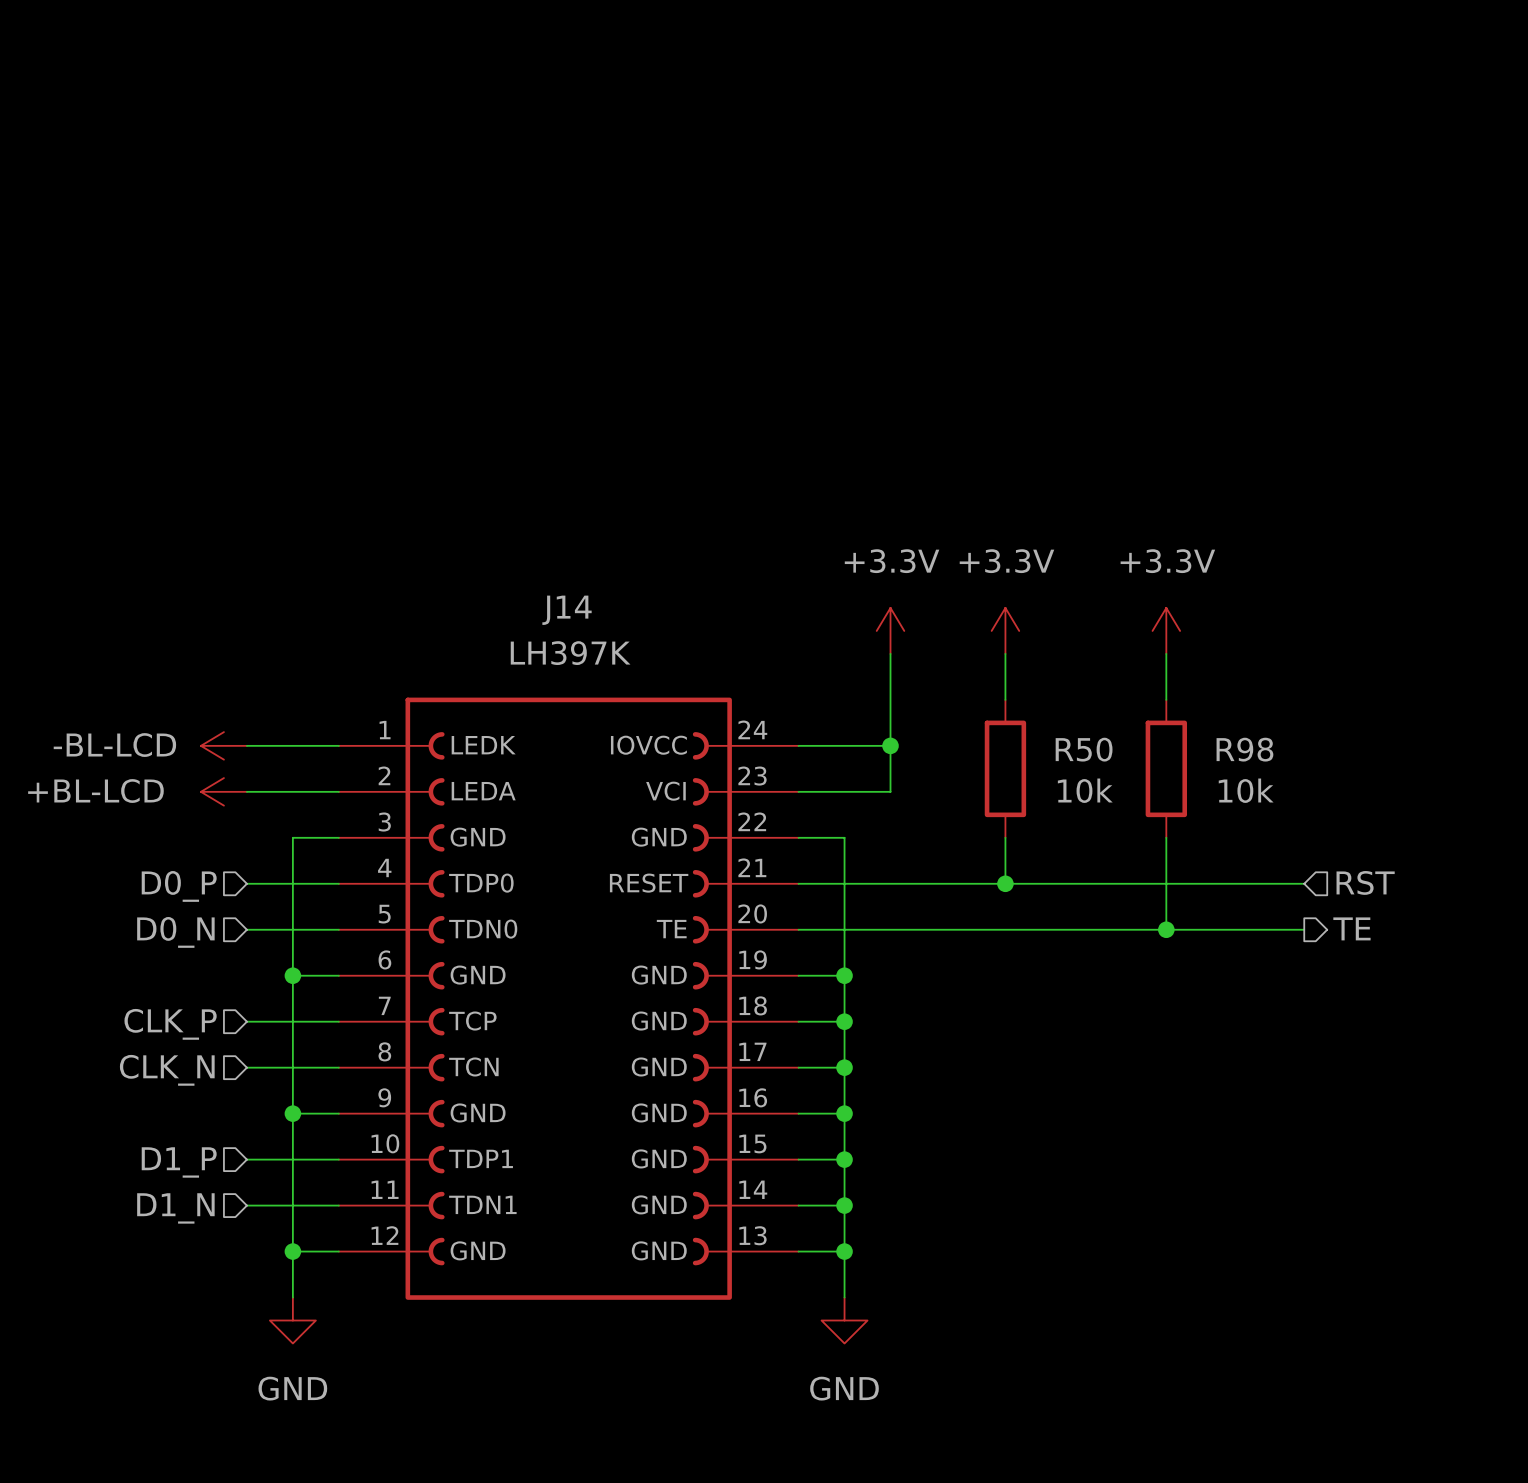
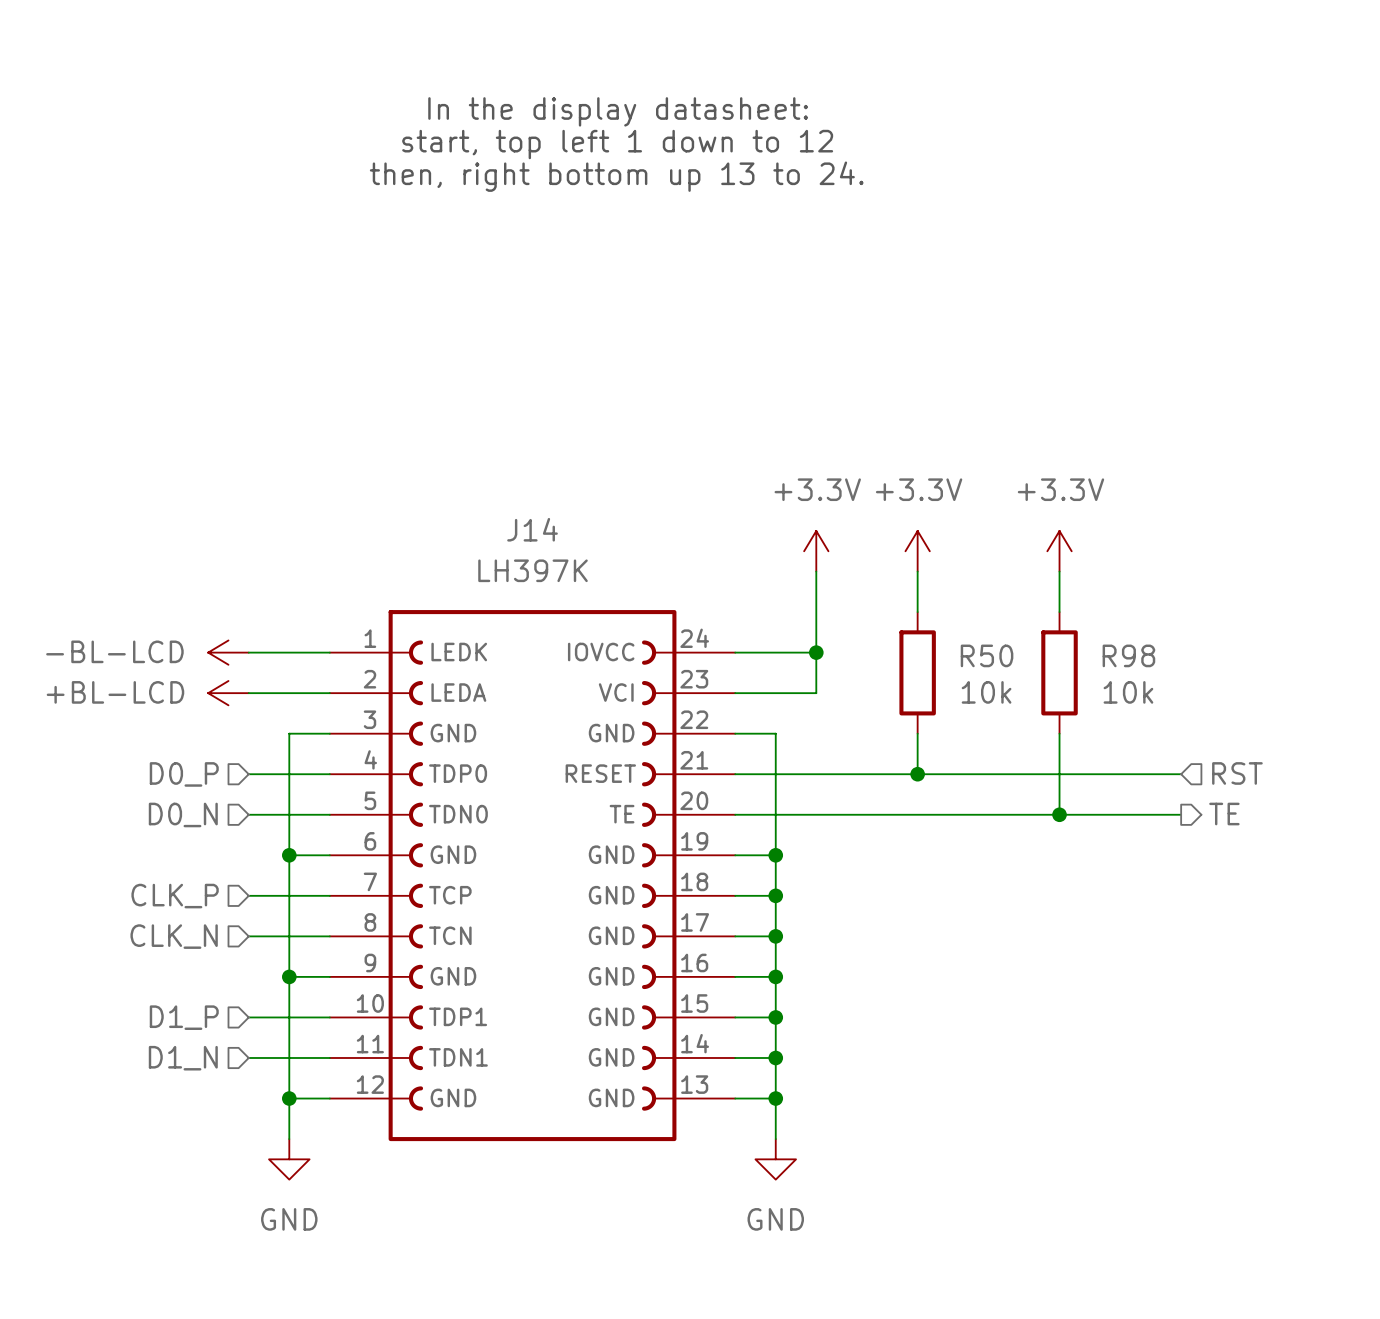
text: none -> In the display datasheet: (618, 111)
text: none -> start, top left 1 down to 12 (617, 144)
text: none -> then, right bottom up 13 to 24. (616, 176)

